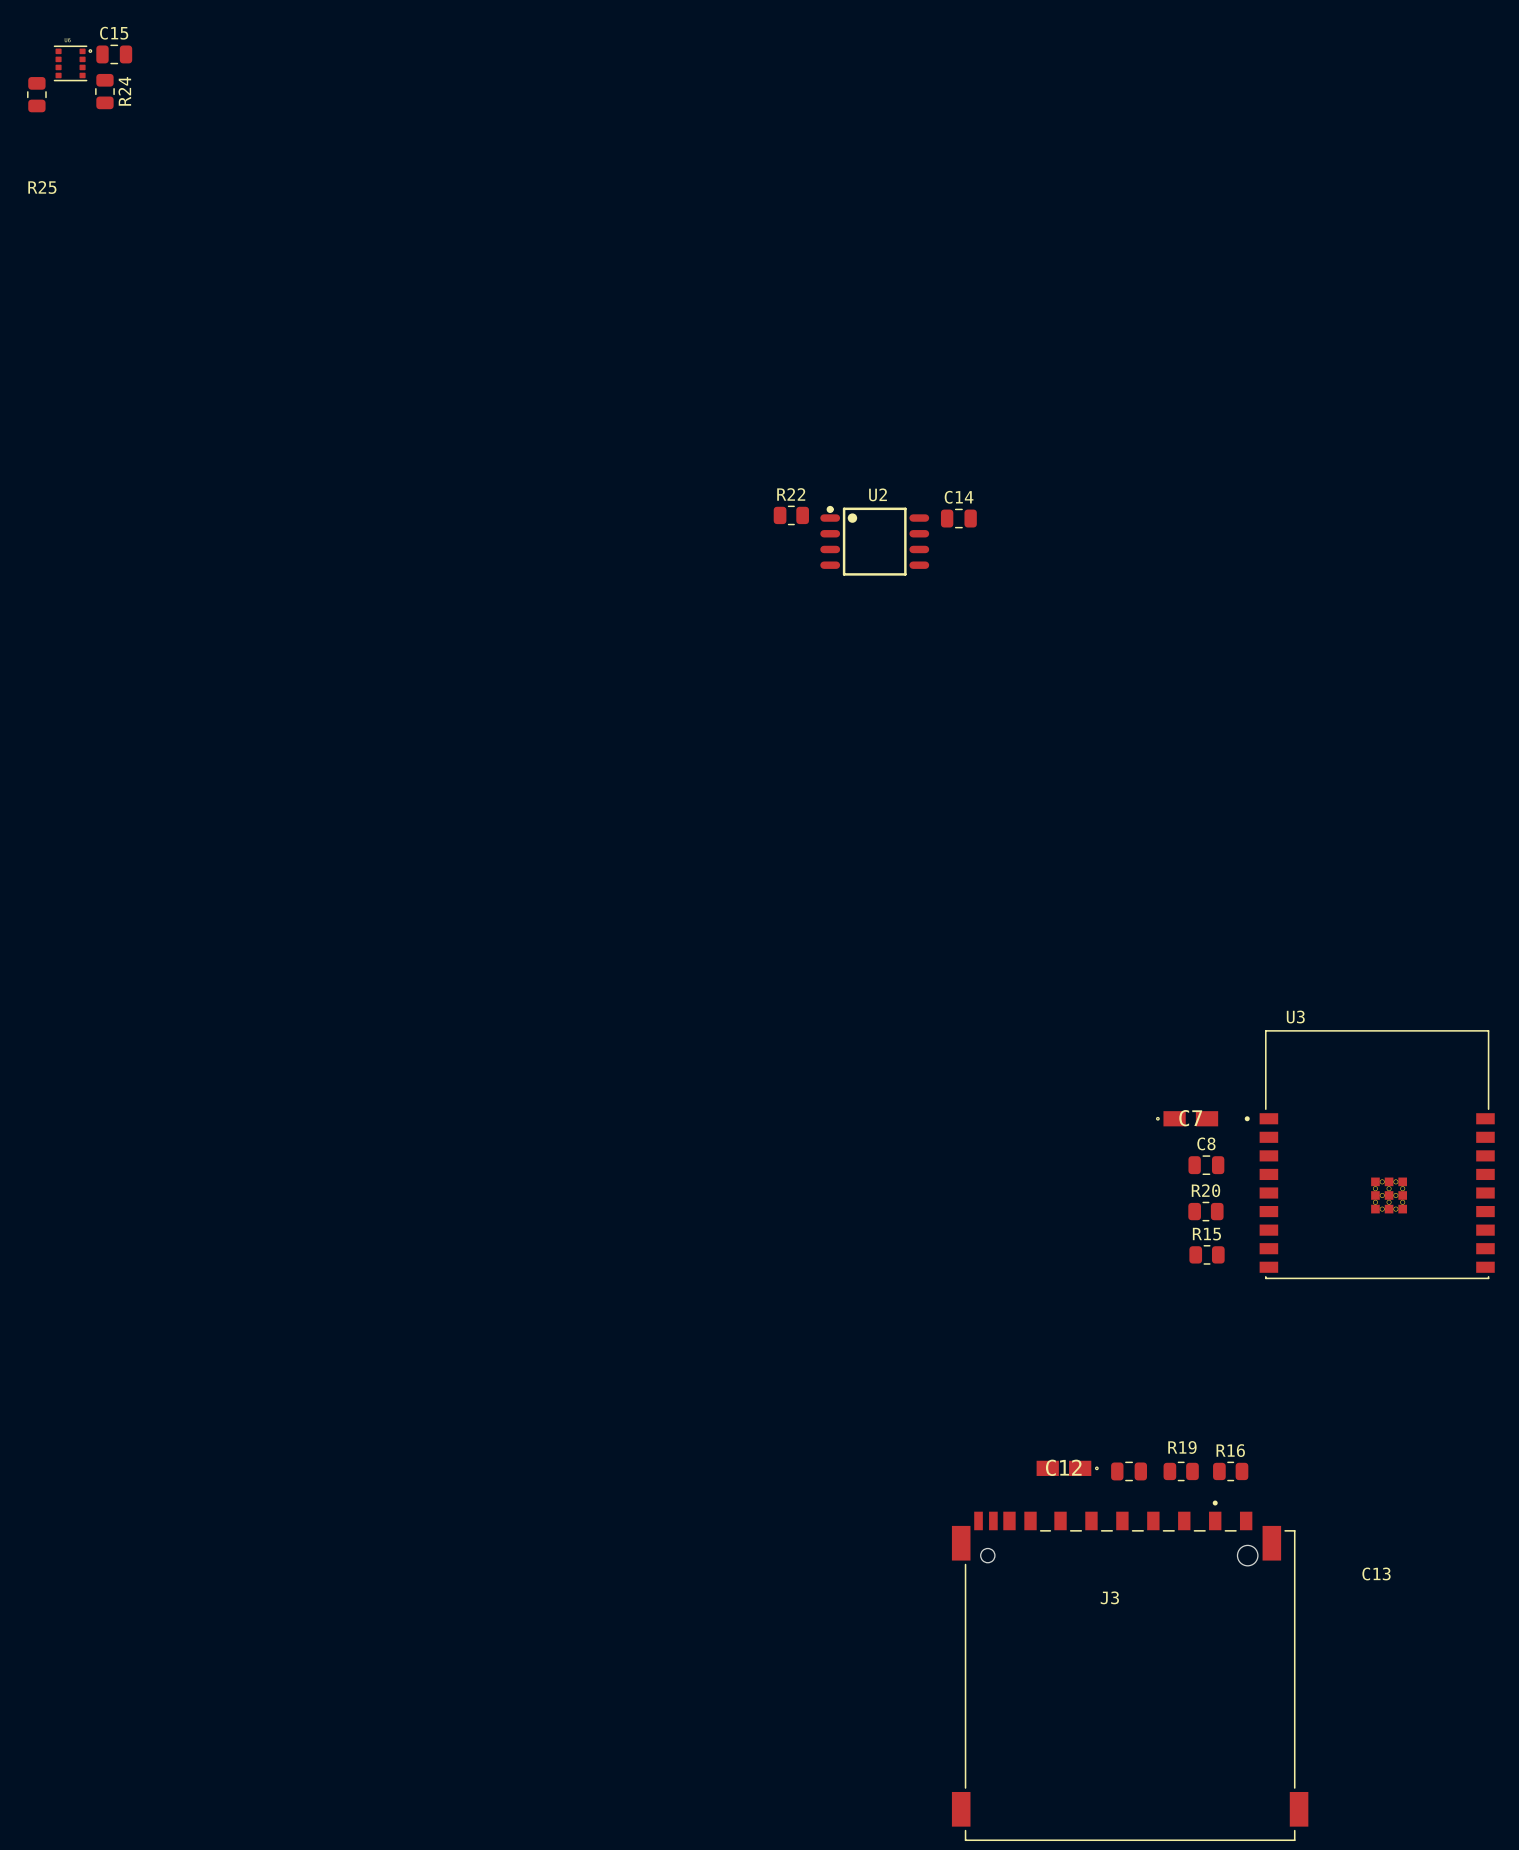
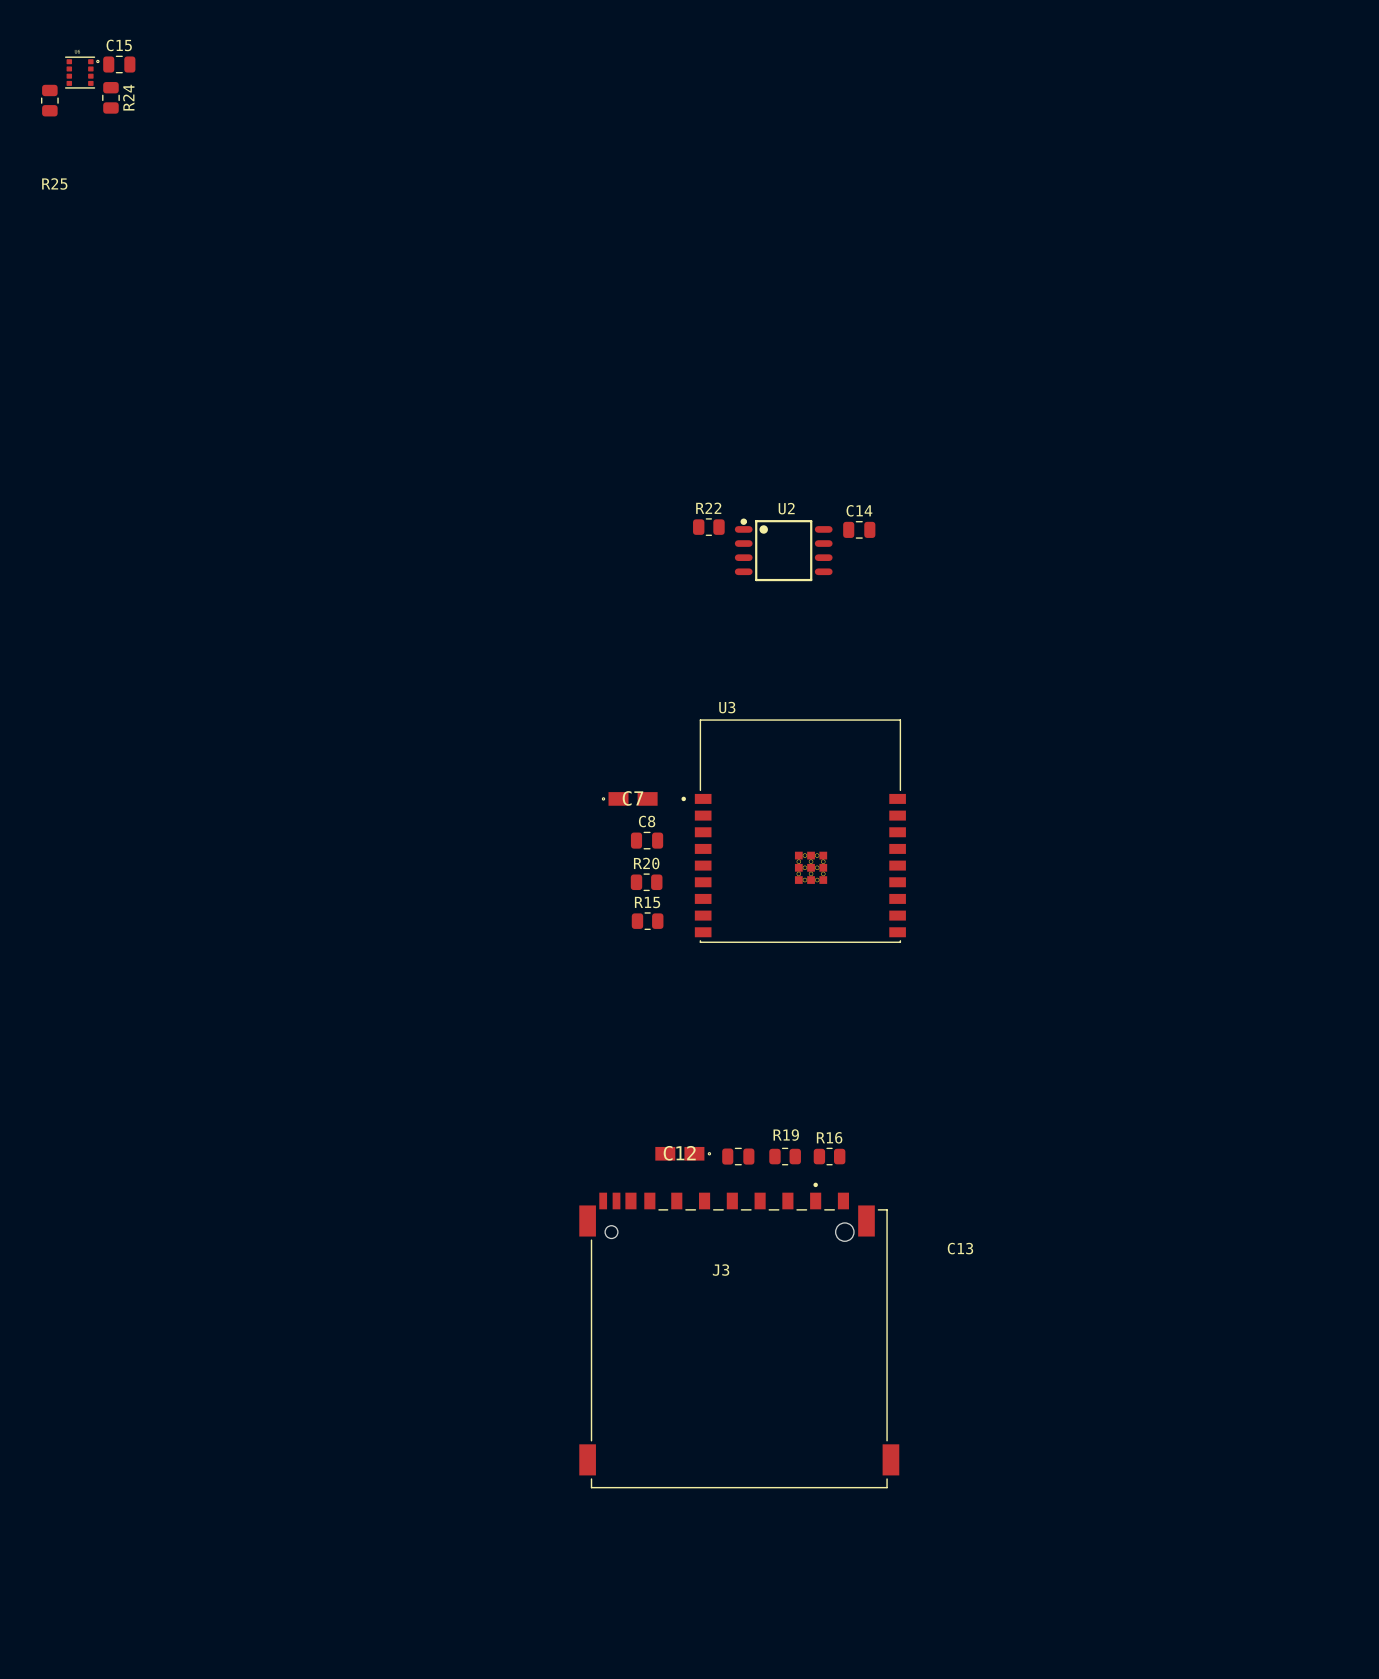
R22 position: (791, 515) -> (708, 527)
C14 position: (958, 518) -> (859, 529)
U2 position: (874, 540) -> (783, 549)
C7 position: (1187, 1118) -> (629, 798)
U3 position: (1369, 1154) -> (793, 831)
C8 position: (1206, 1165) -> (647, 840)
R20 position: (1205, 1211) -> (646, 882)
R15 position: (1207, 1254) -> (647, 921)
C12 position: (1067, 1468) -> (683, 1153)
C13 position: (1129, 1471) -> (738, 1156)
R19 position: (1181, 1471) -> (785, 1156)
R16 position: (1230, 1471) -> (829, 1156)
J3 position: (1130, 1670) -> (739, 1335)

